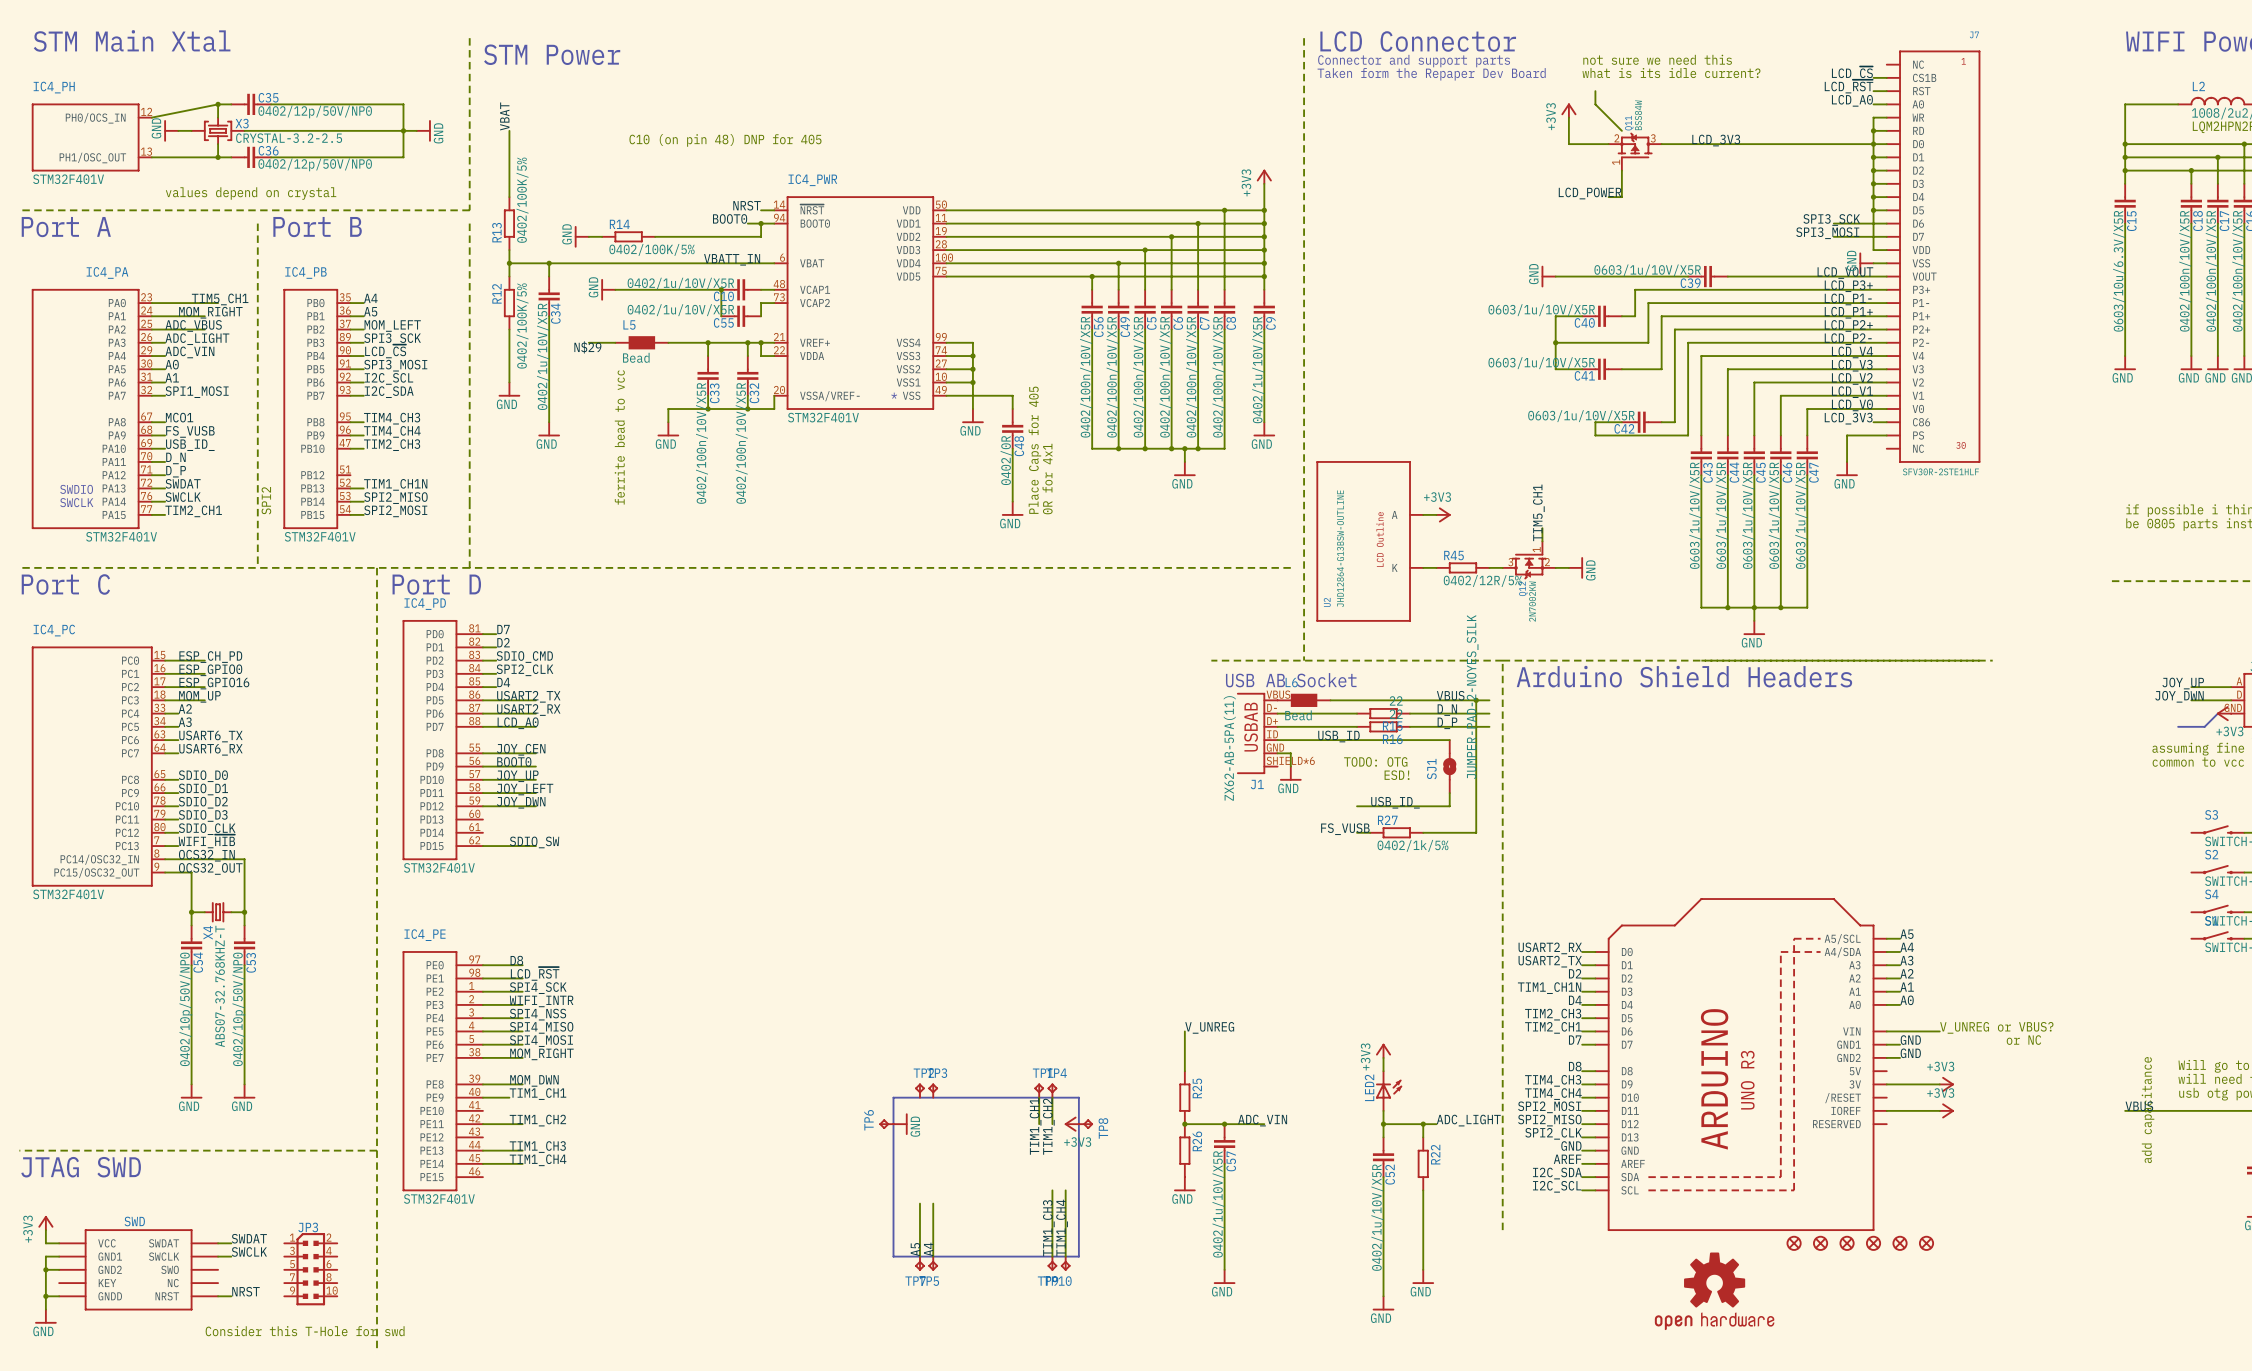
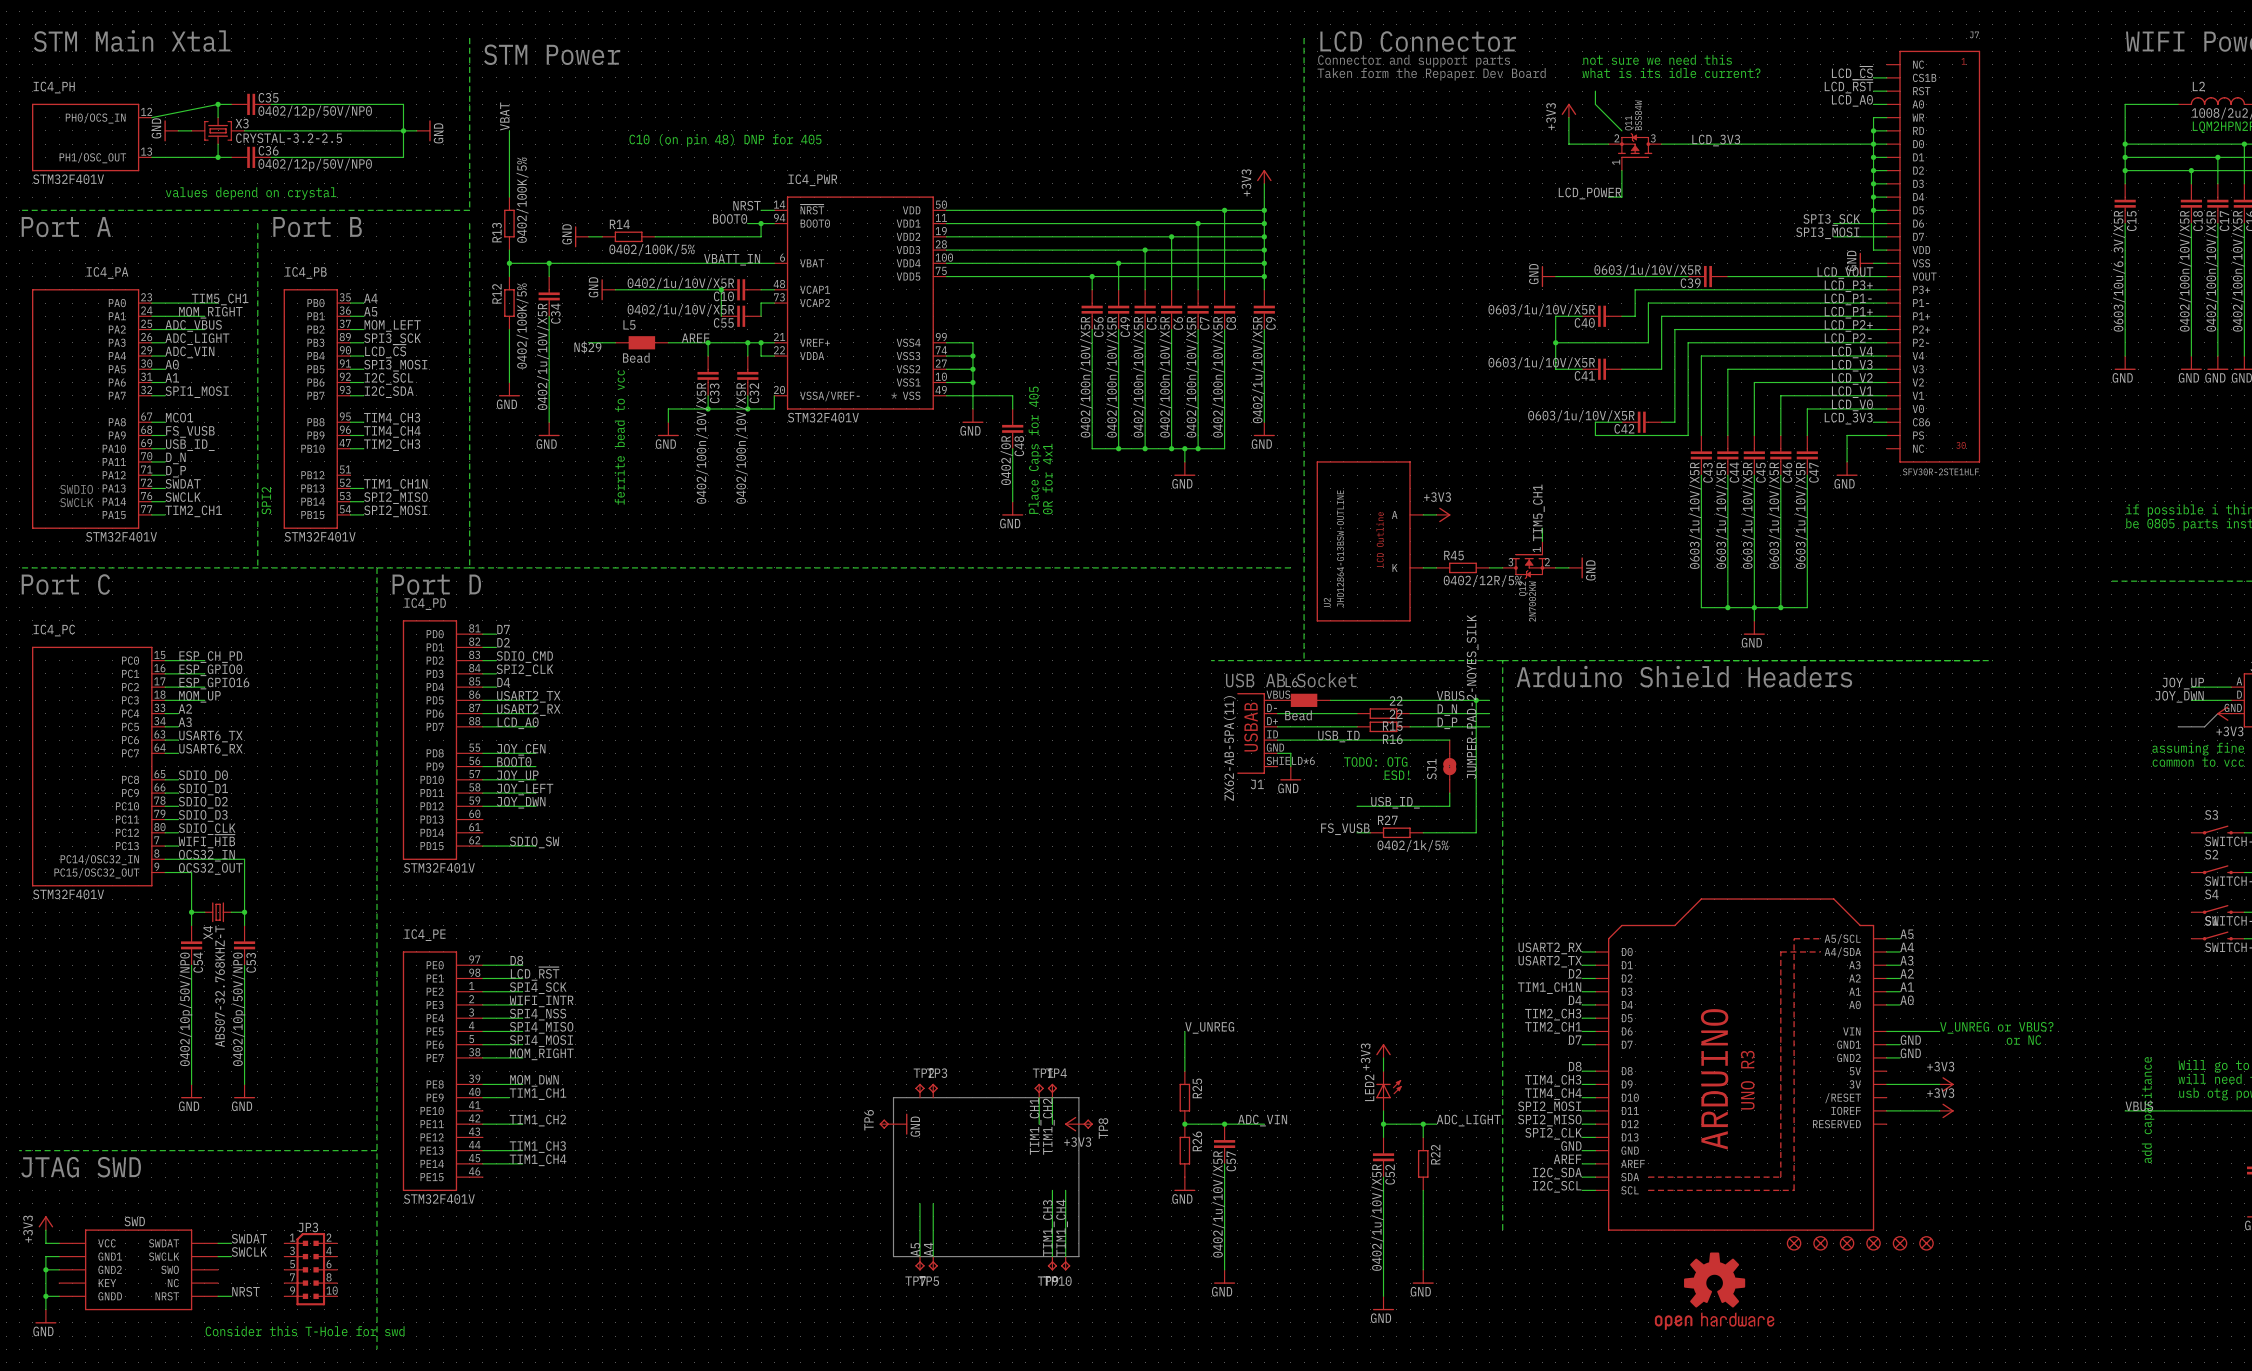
label: none -> AREF (695, 338)

